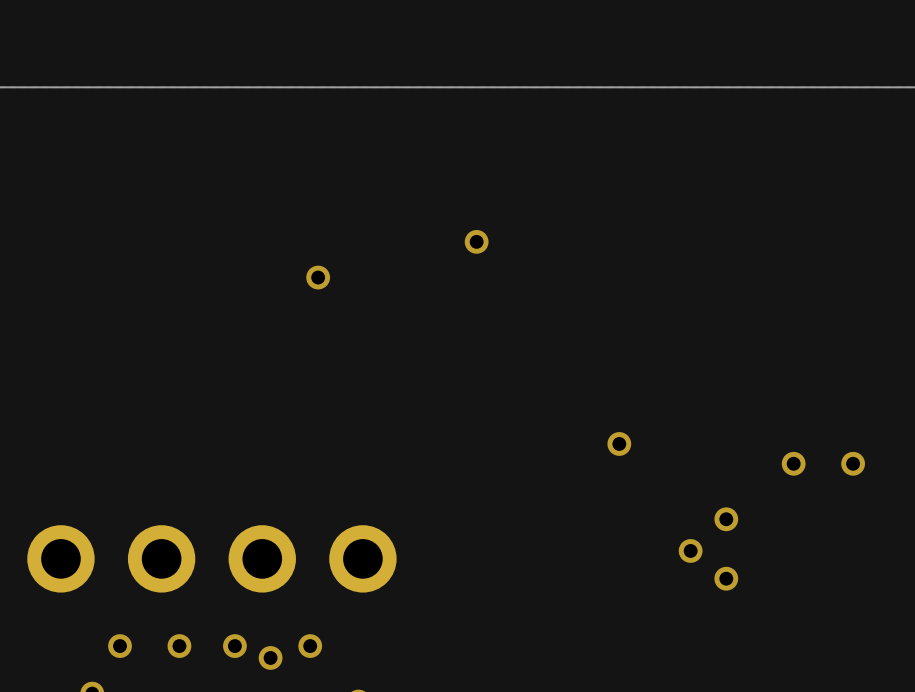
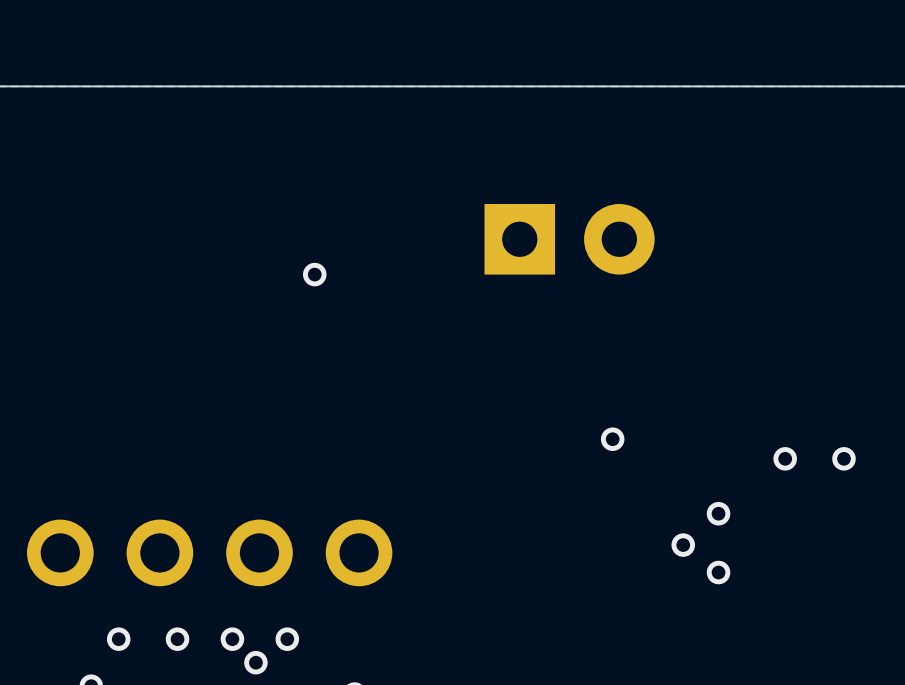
via: (476, 241) -> none
part: none -> (569, 239)
via: none -> (287, 639)
via: (310, 646) -> none
via: (270, 657) -> none
via: none -> (255, 662)

